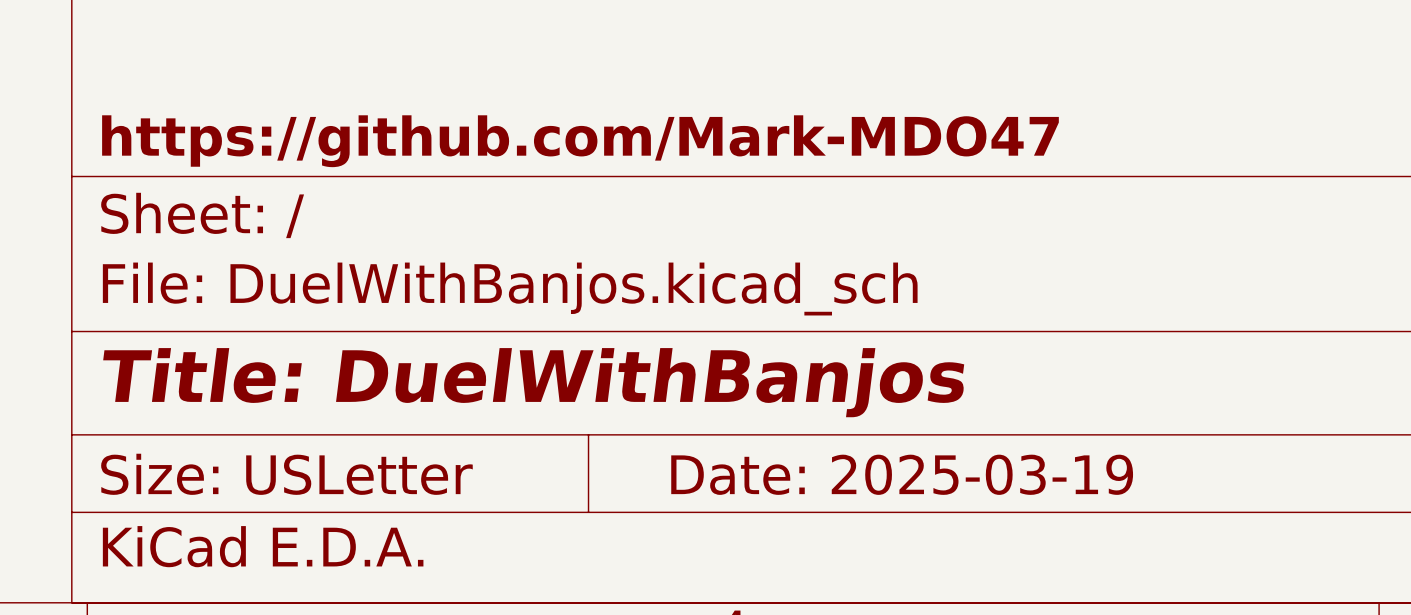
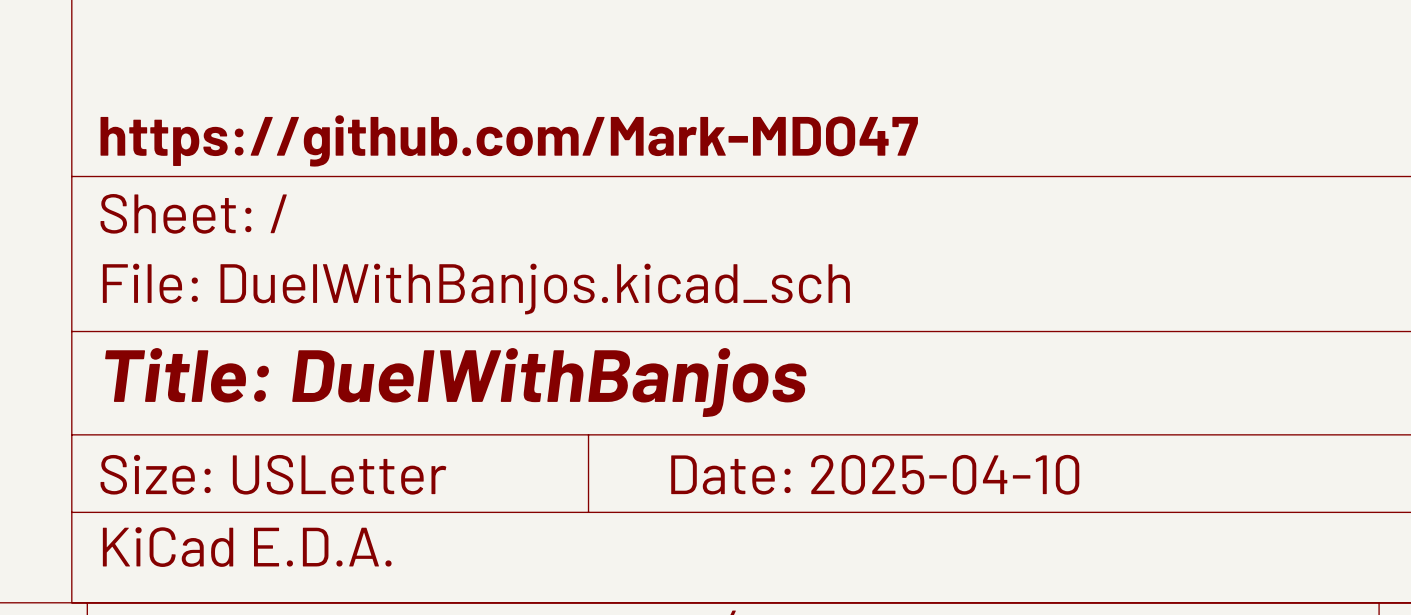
title block: Date: 2025-03-19 (902, 474) -> Date: 2025-04-10 (875, 474)

